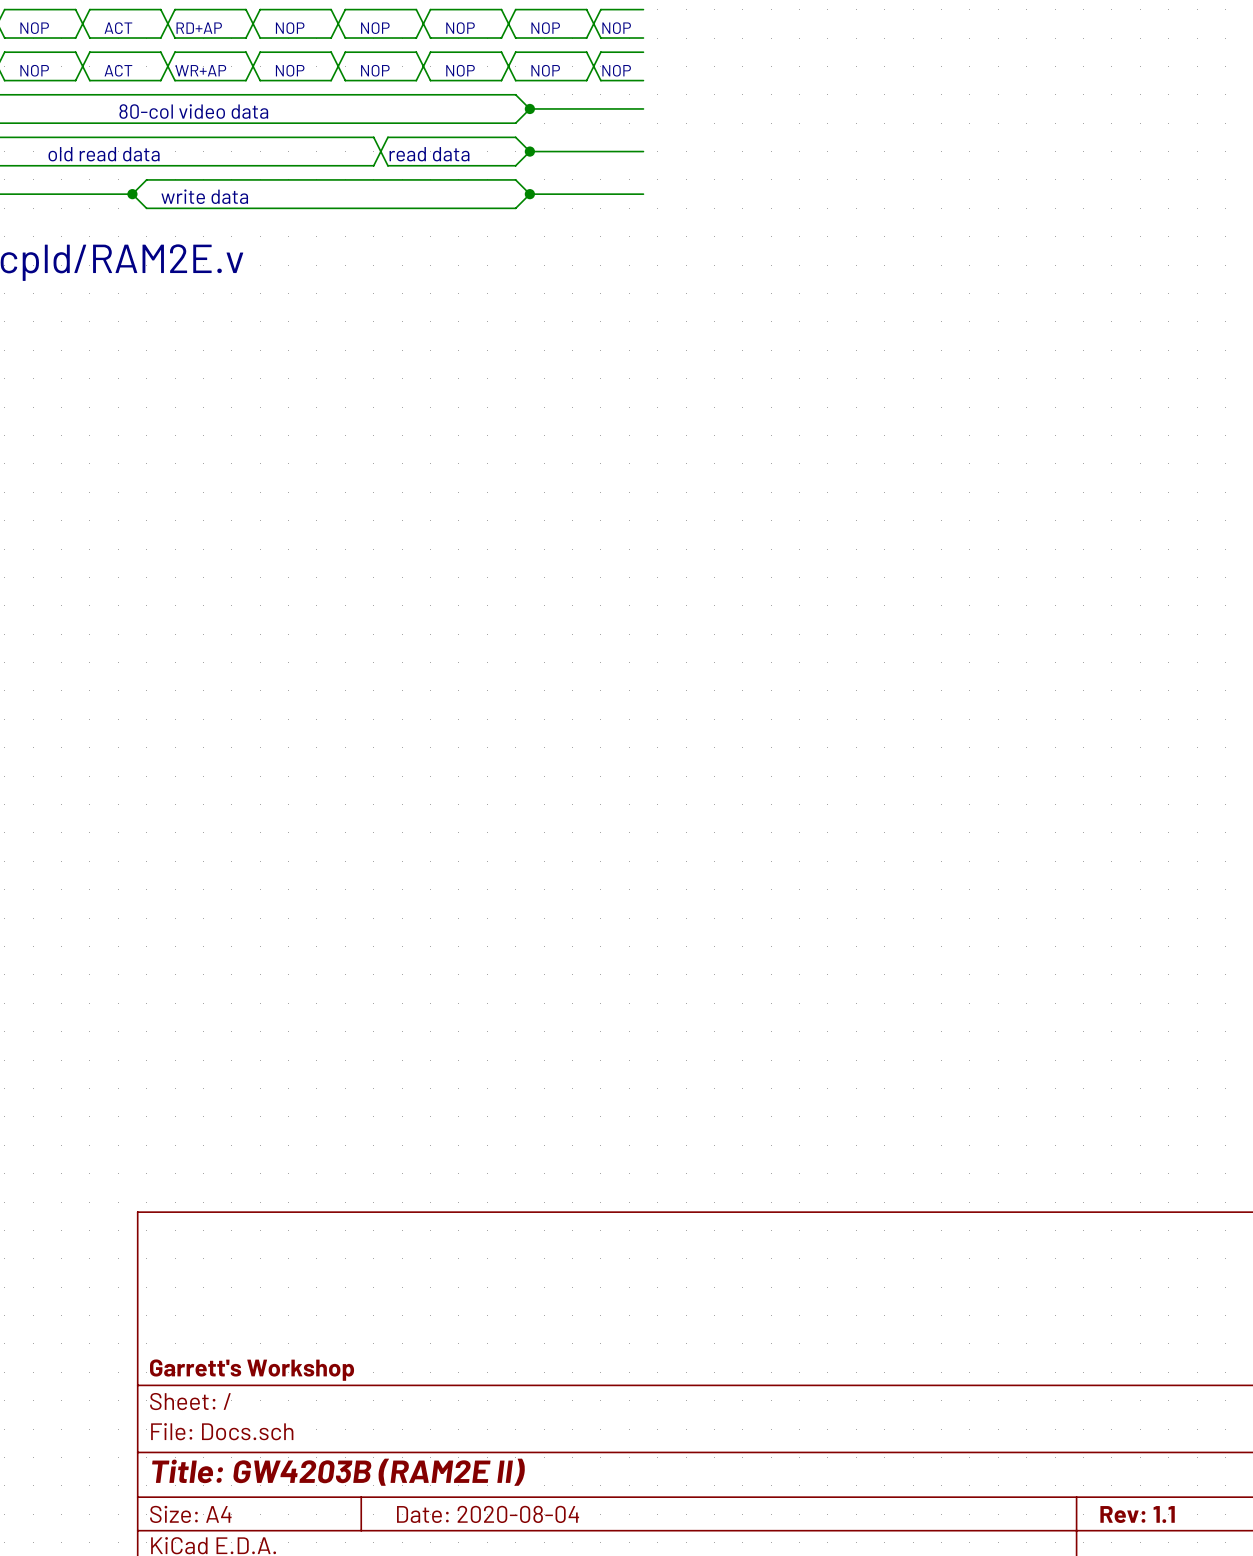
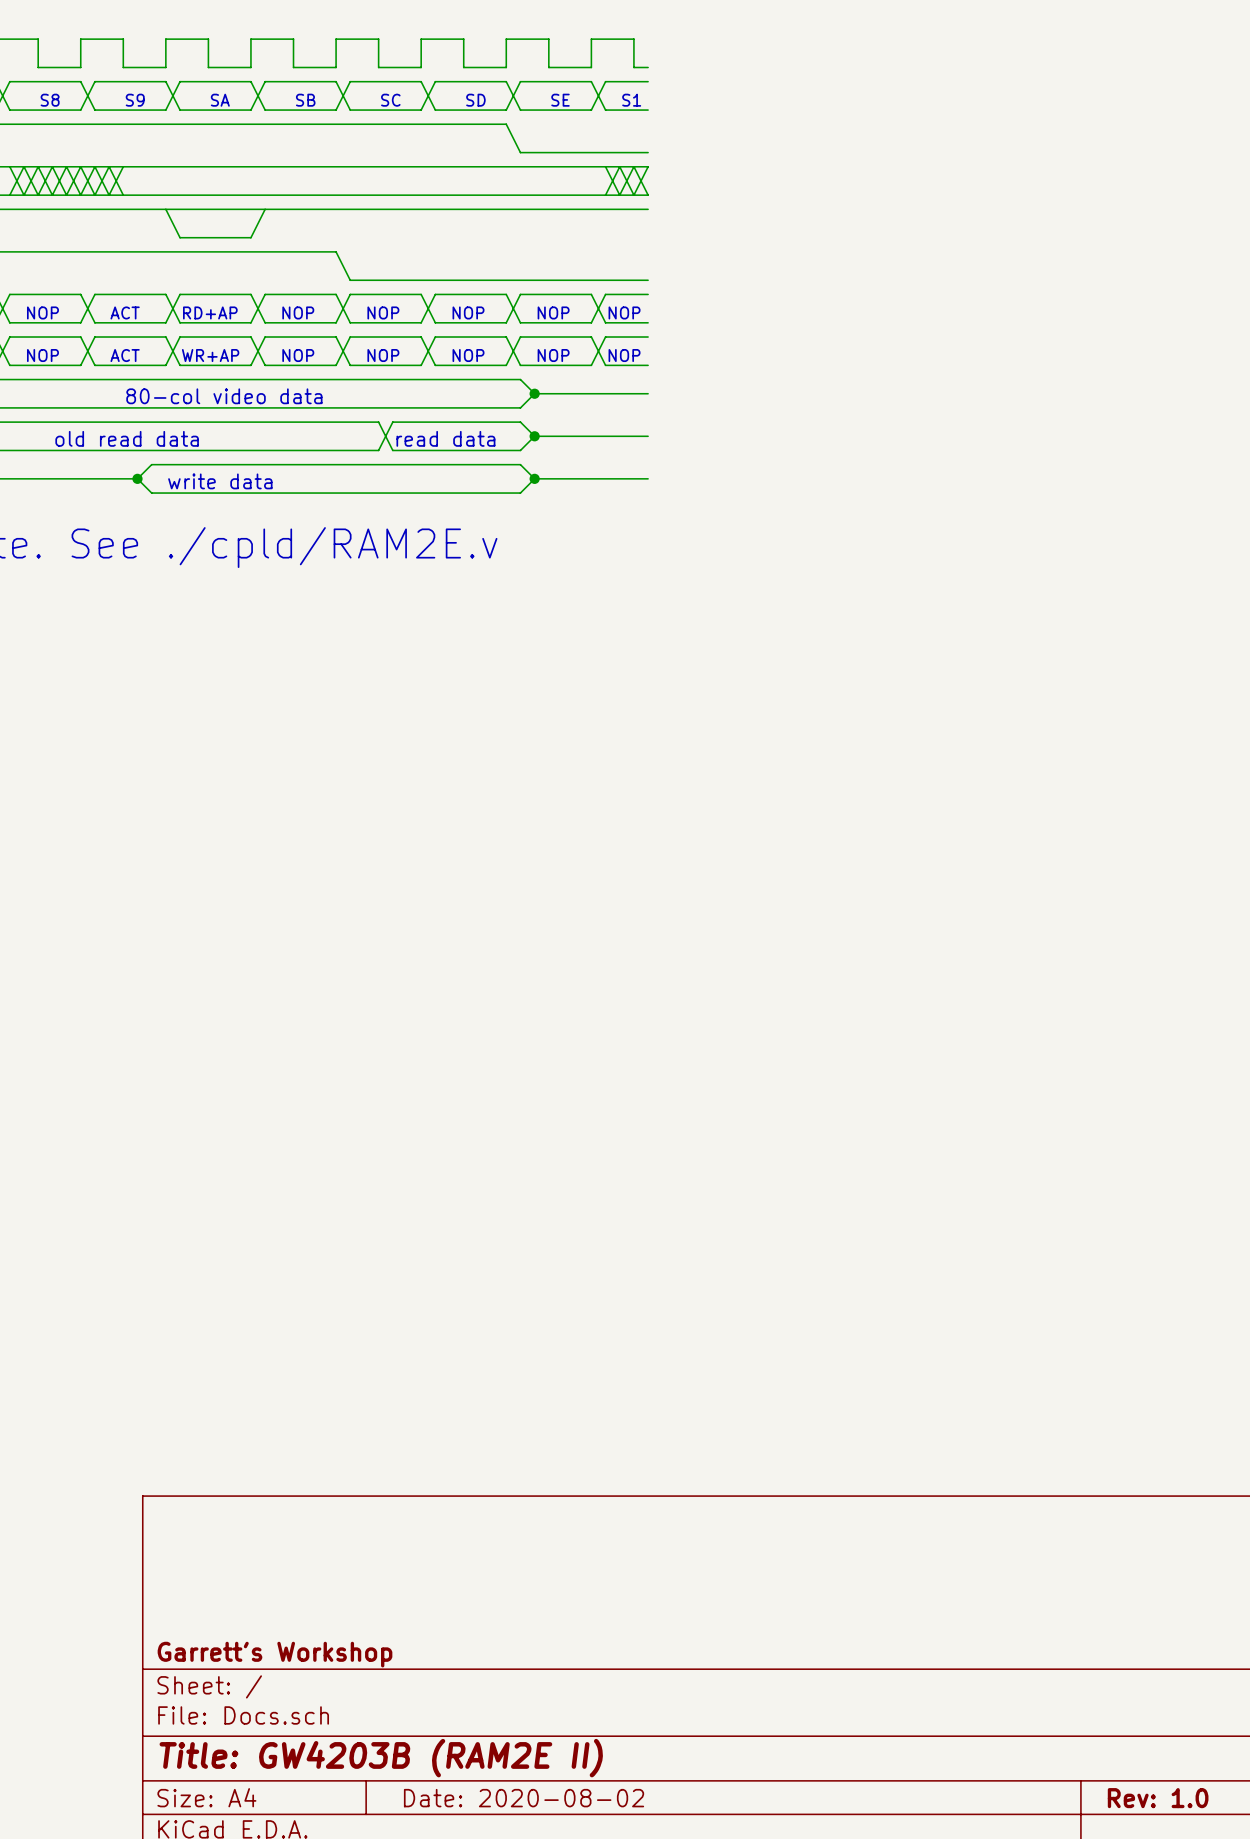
title block: Date: 2020-08-04 (488, 1514) -> Date: 2020-08-02 (524, 1798)
title block: Rev: 1.1 (1137, 1514) -> Rev: 1.0 (1158, 1798)

